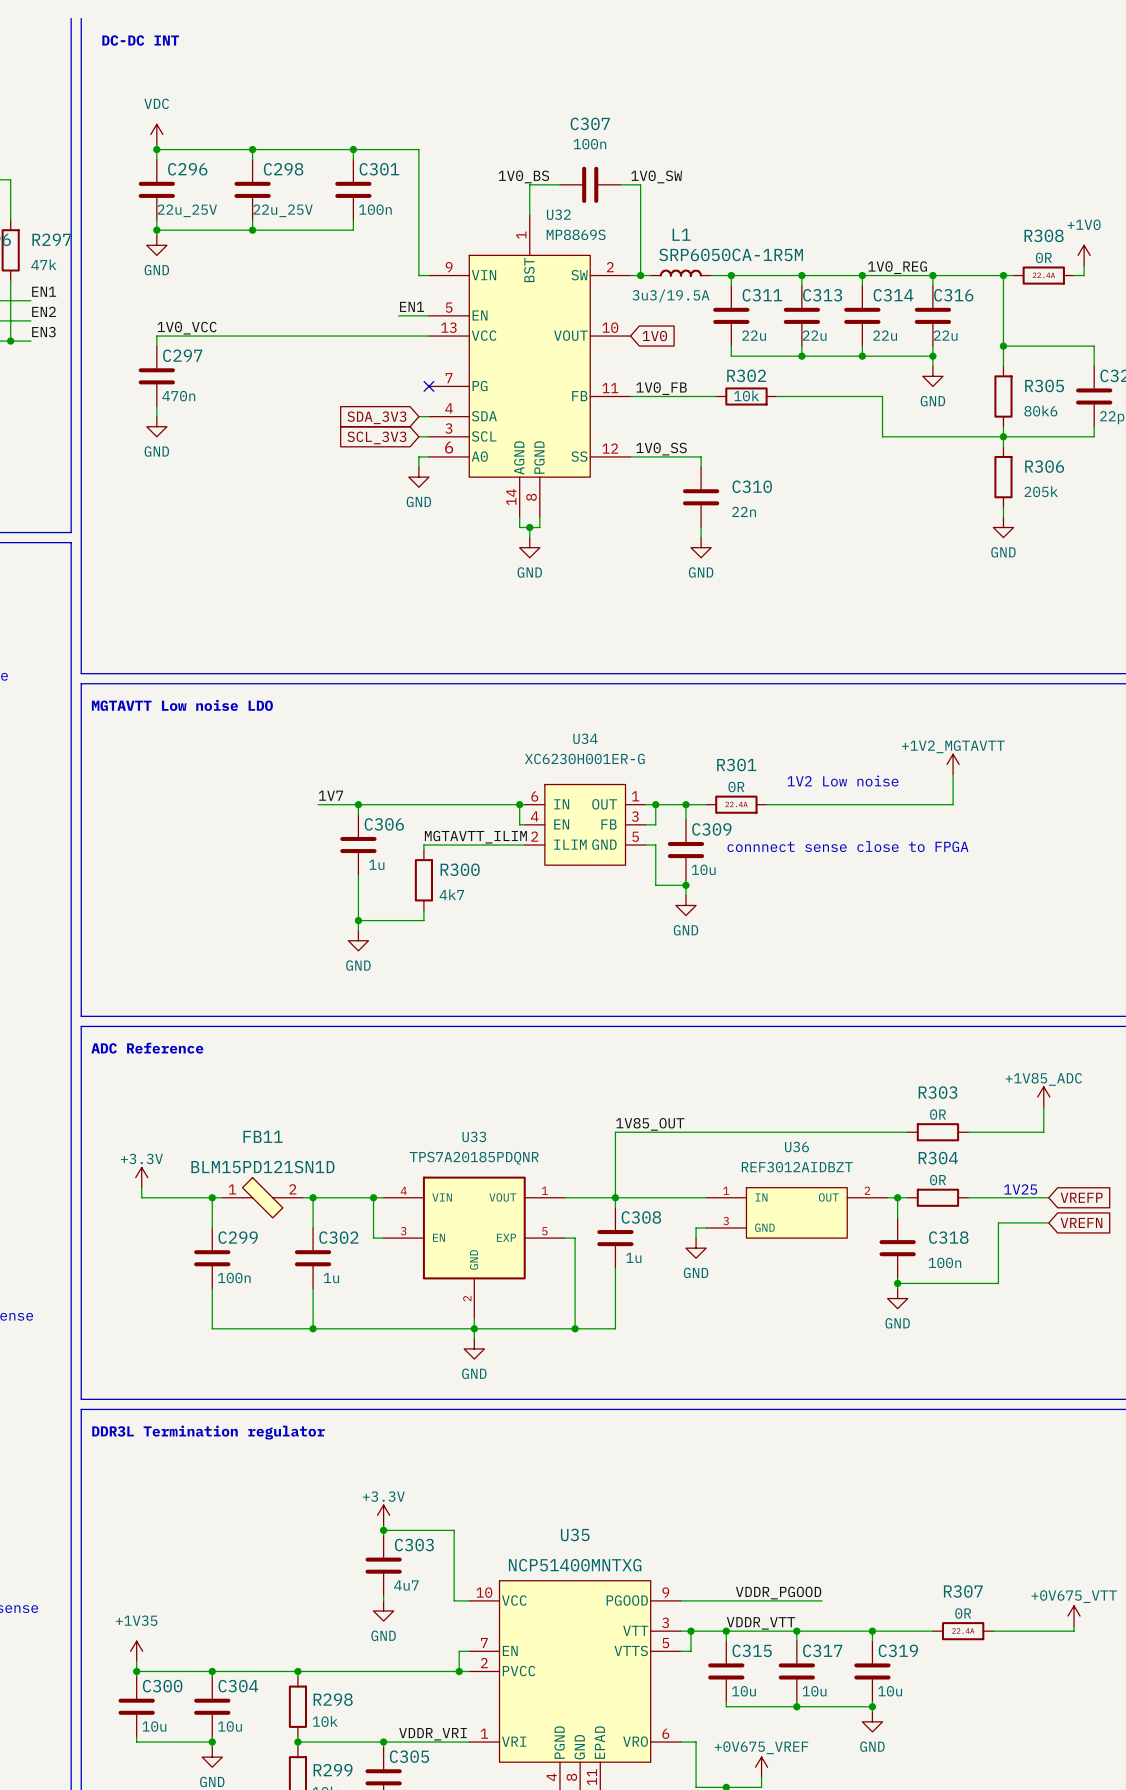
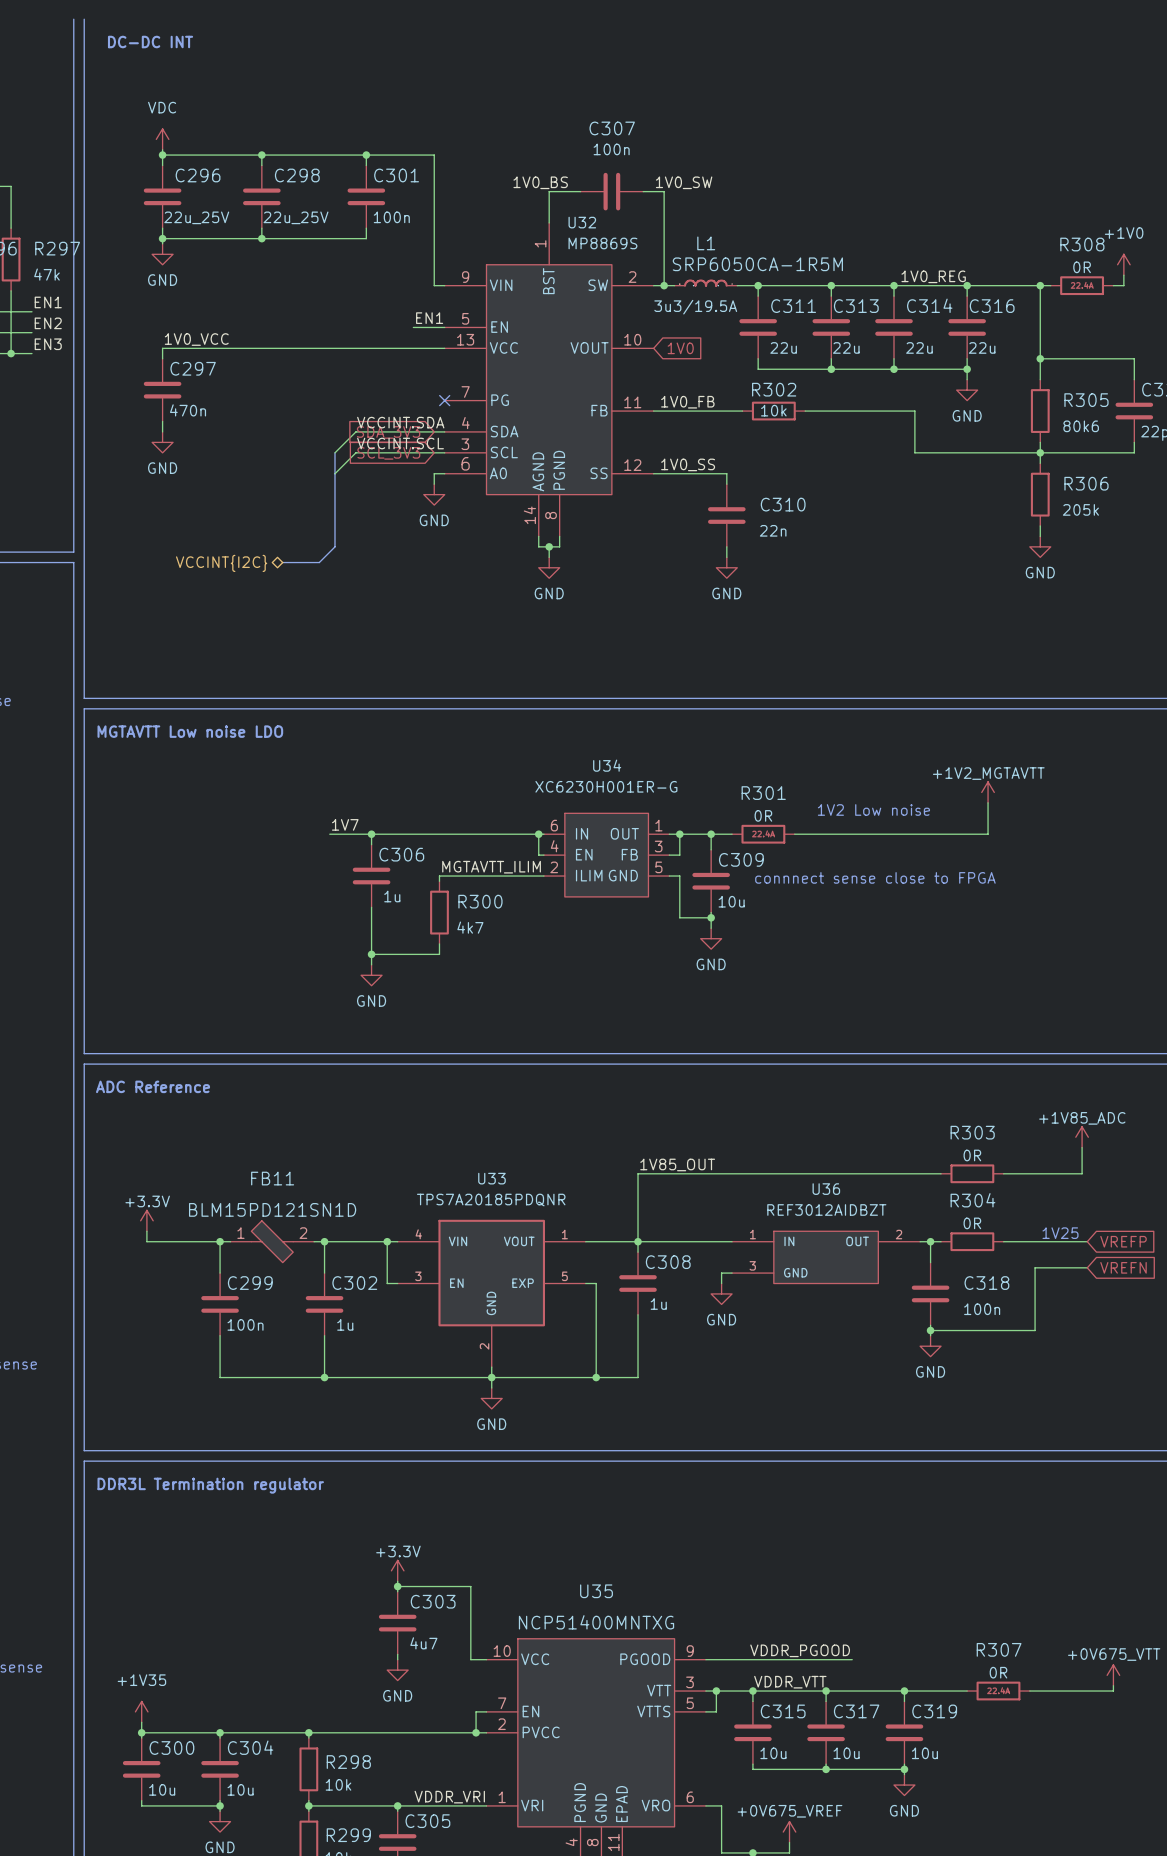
label: none -> VCCINT.SDA (400, 422)
wire: none -> (434, 431) (355, 431) (334, 452)
label: none -> VCCINT.SCL (400, 443)
bus: none -> (334, 452) (334, 546) (319, 562) (282, 562)
wire: none -> (355, 452) (334, 473)
wire: none -> (355, 452) (434, 452)
hierarchical label: none -> VCCINT{I2C} (221, 563)

